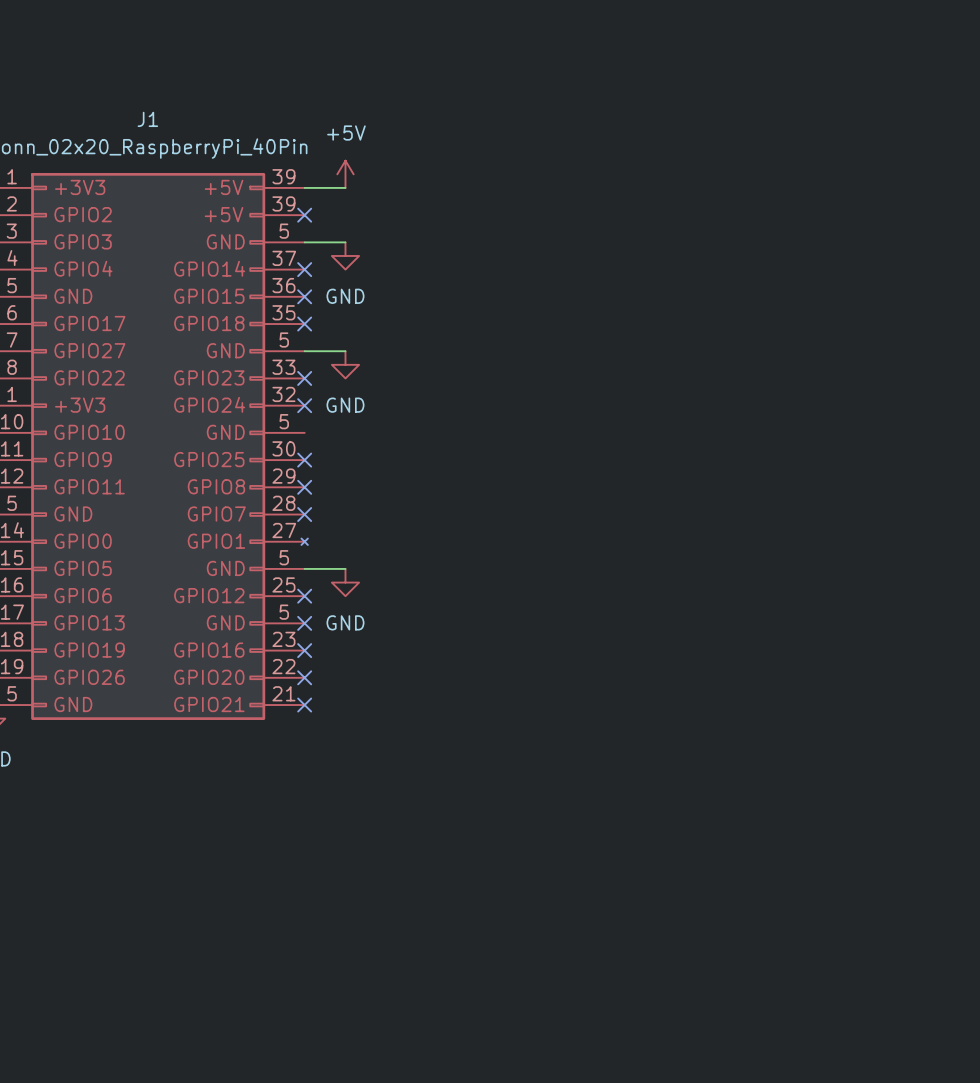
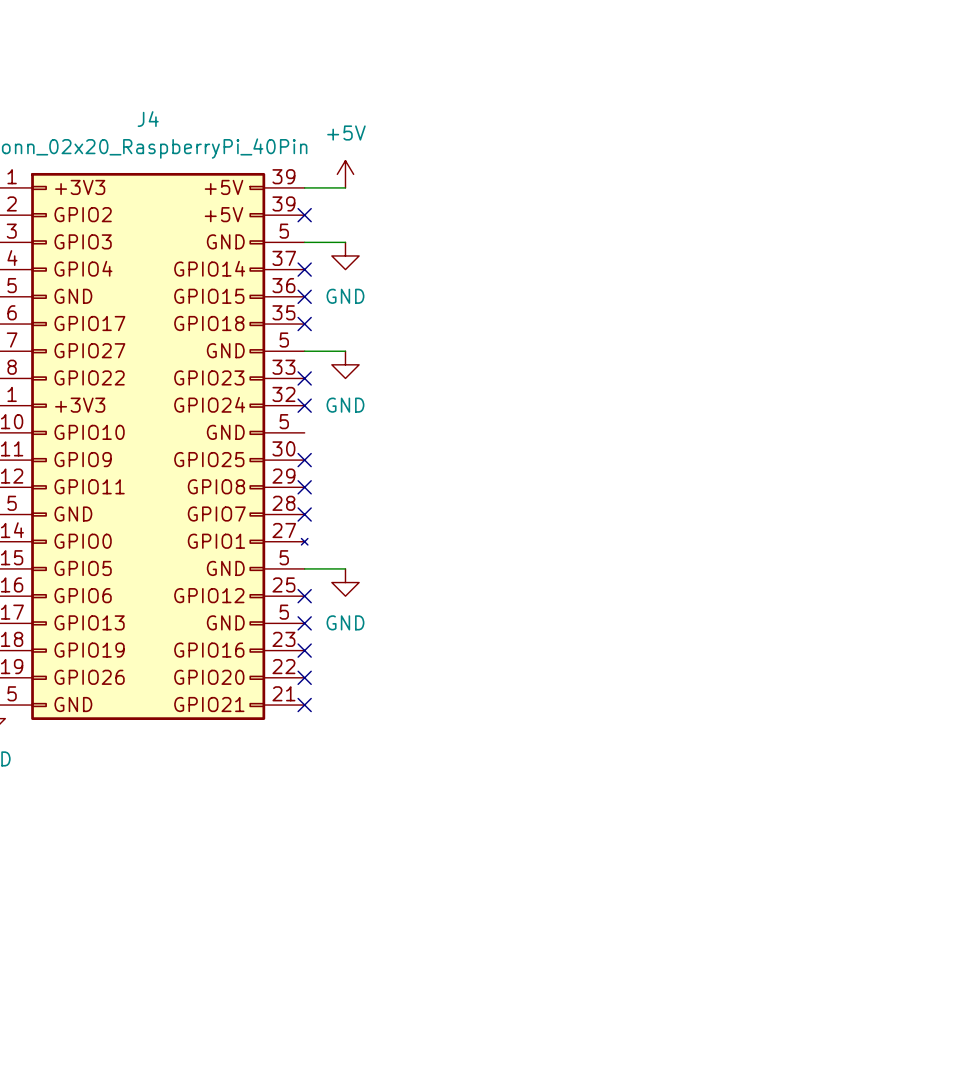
J1 name: J1 (147, 119) -> J4 (148, 119)

